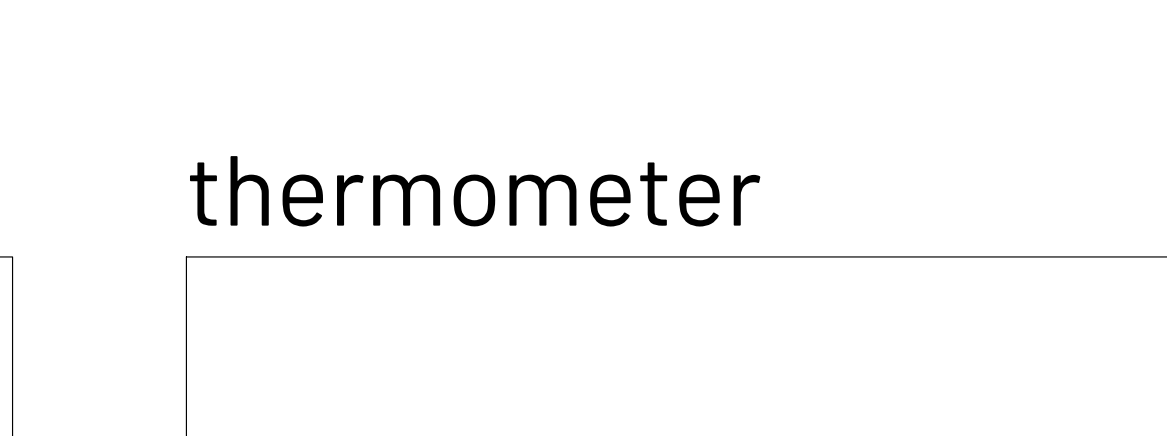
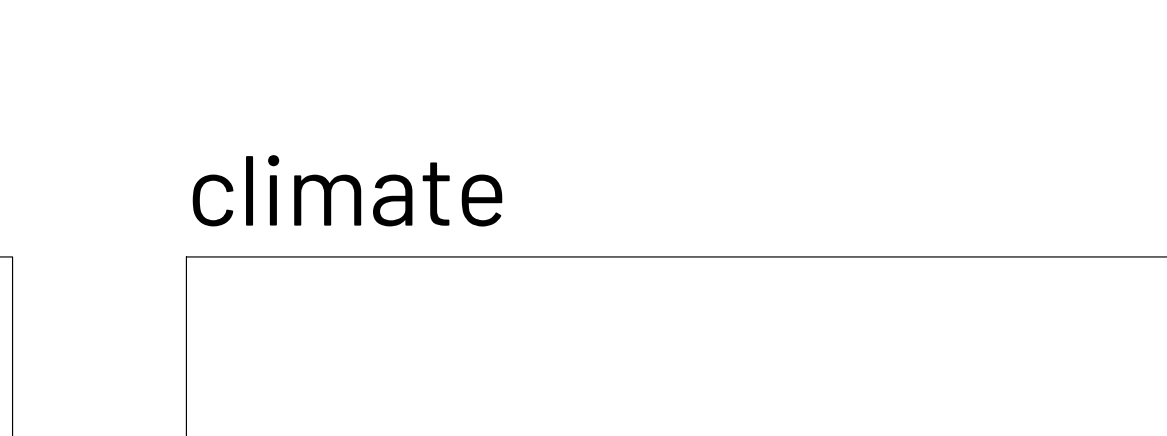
sheet thermometer name: thermometer (475, 191) -> climate (347, 190)

